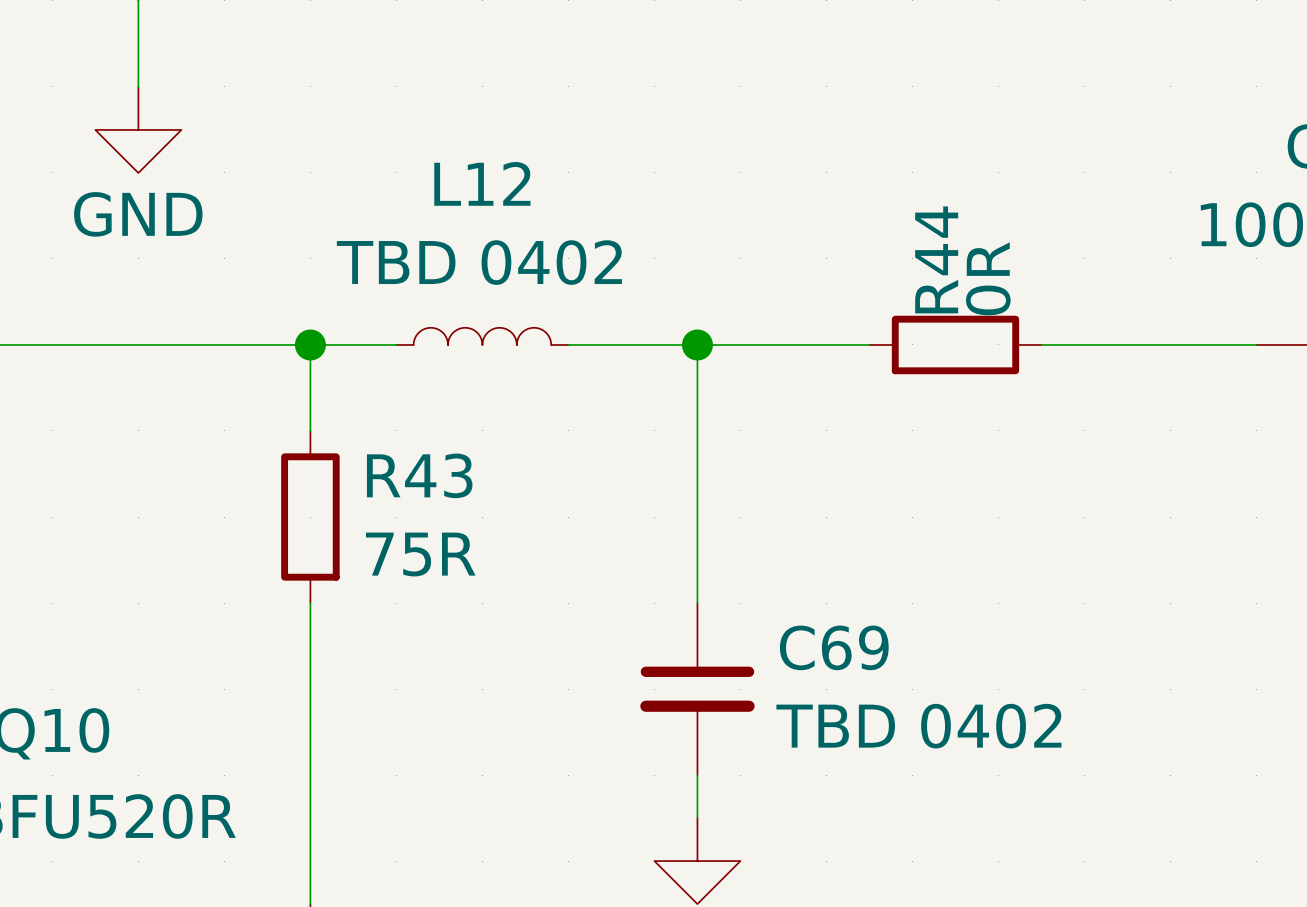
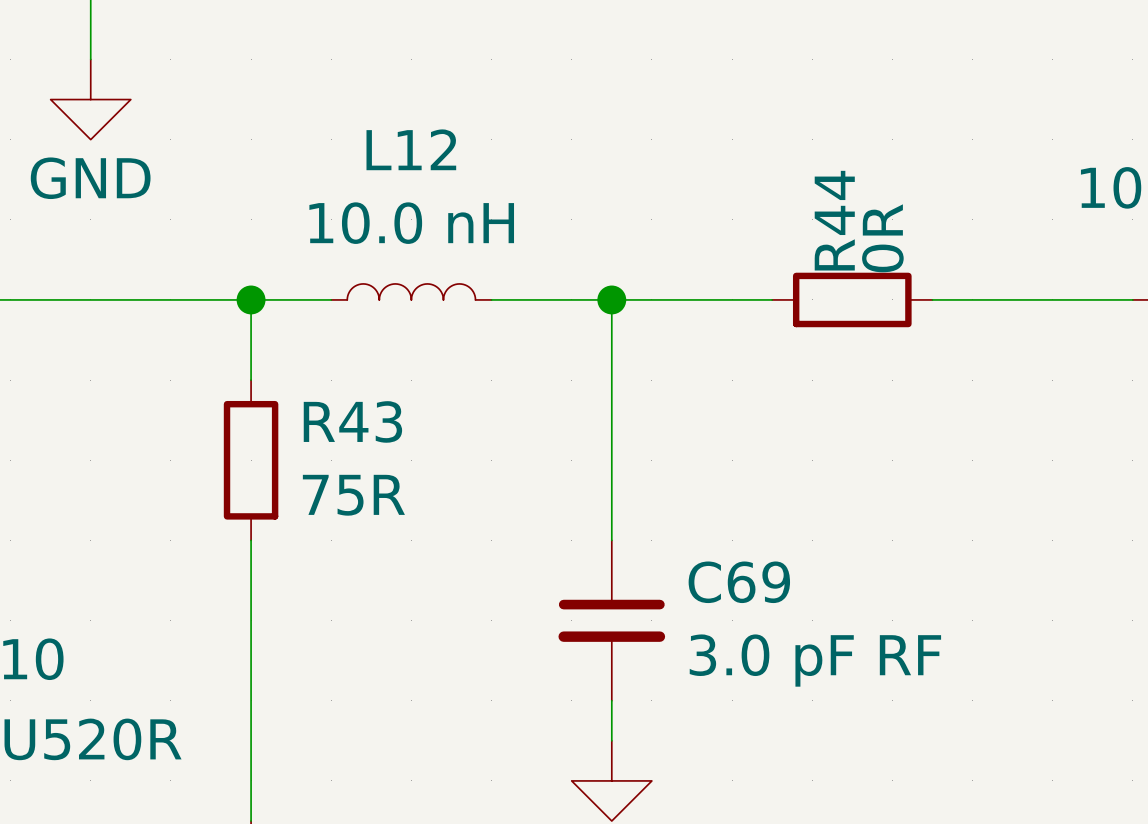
L12 value: TBD 0402 (479, 262) -> 10.0 nH (411, 223)
C69 value: TBD 0402 (918, 726) -> 3.0 pF RF (815, 660)

